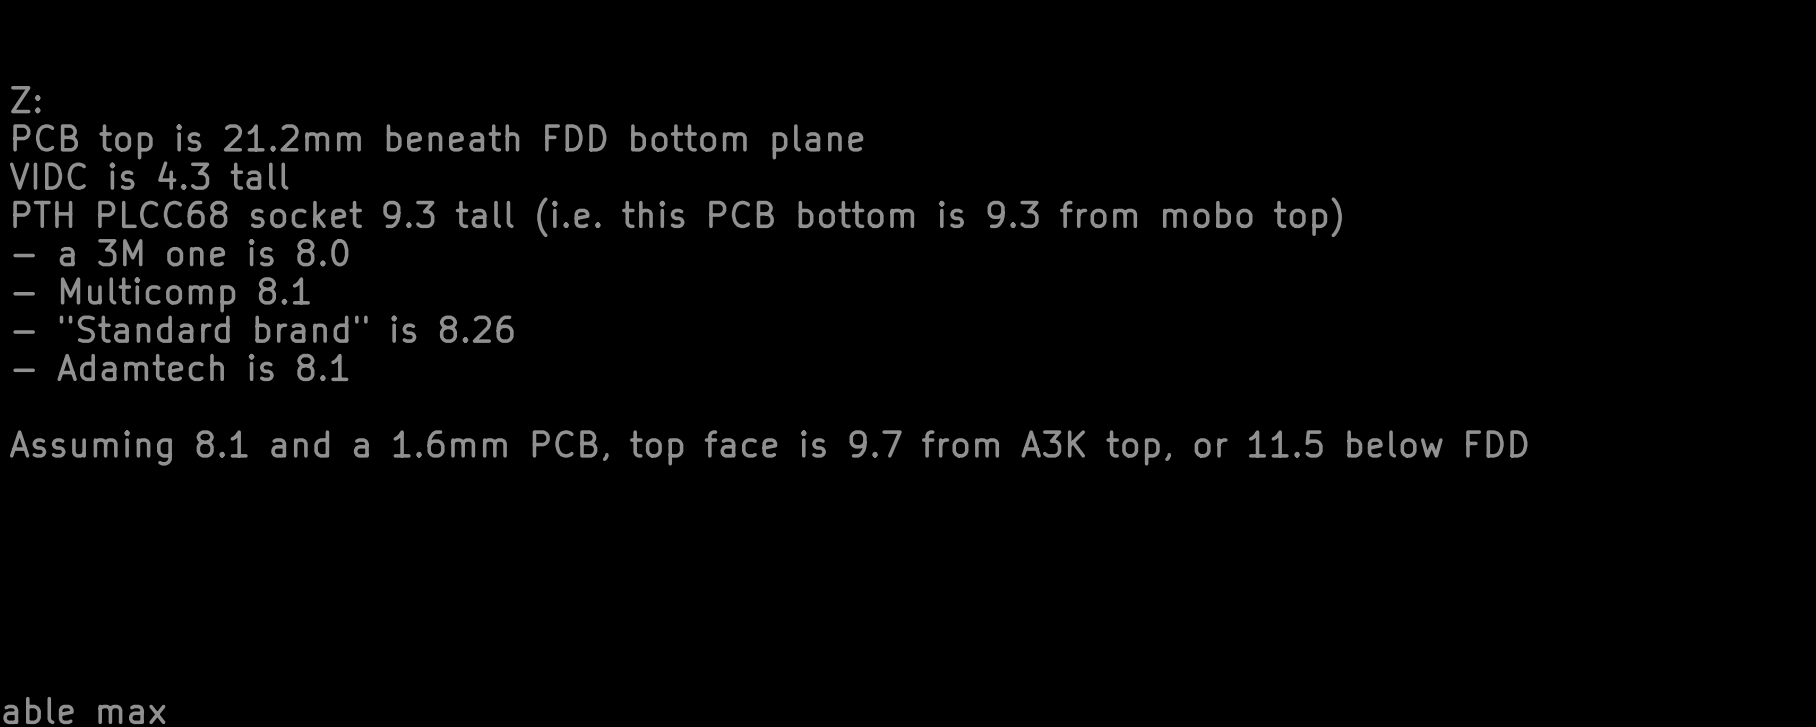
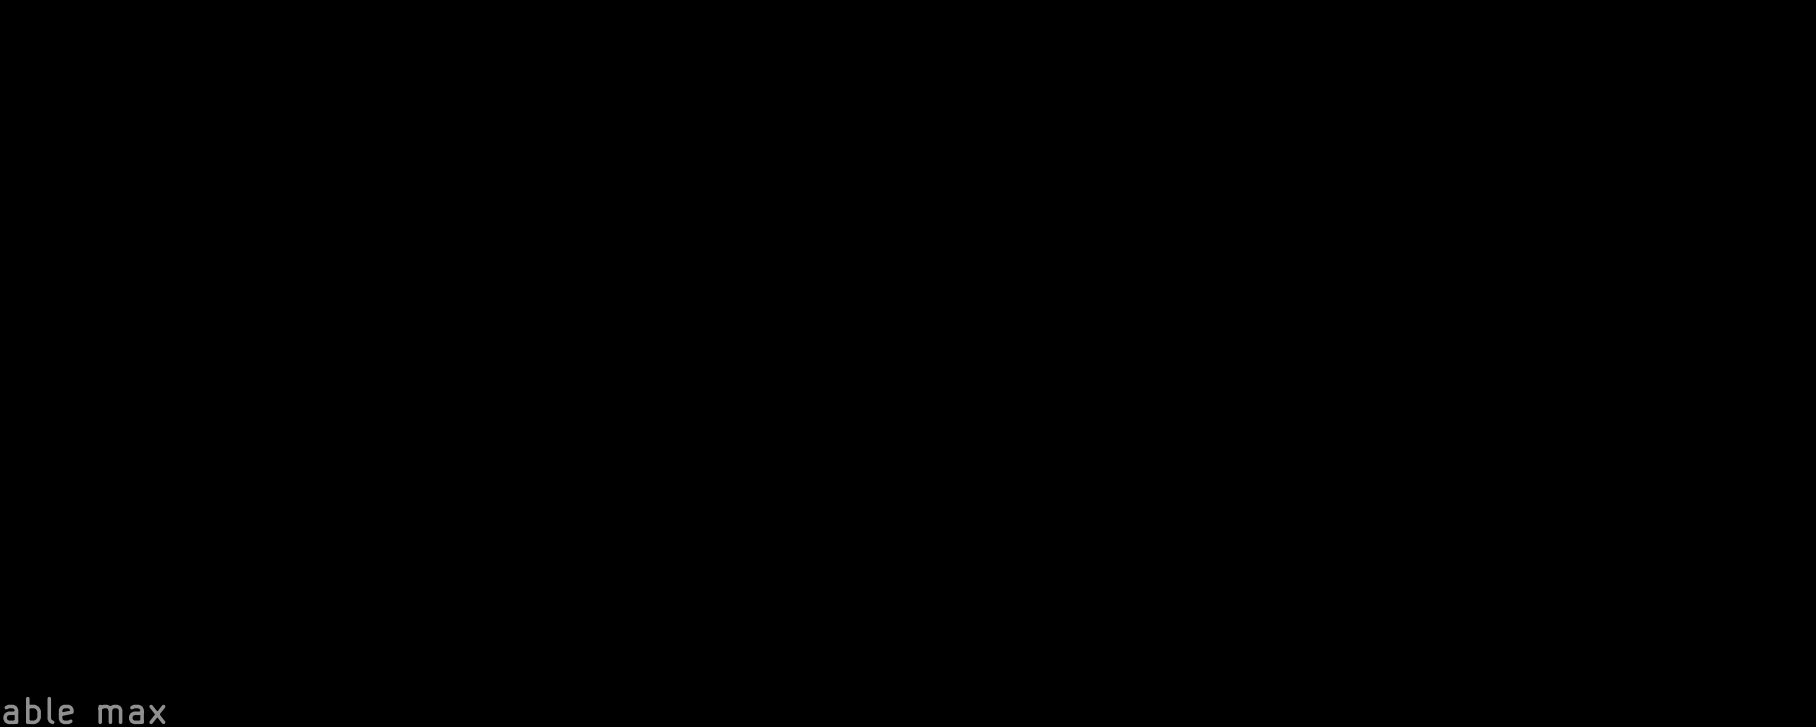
text: Z: (25, 99) -> none
text: PCB top is 21.2mm beneath FDD bottom plane (438, 141) -> none
text: VIDC is 4.3 tall (149, 175) -> none
text: PTH PLCC68 socket 9.3 tall (i.e. this PCB bottom is 9.3 from mobo top) (677, 217) -> none
text: - a 3M one is 8.0 (180, 252) -> none
text: - Multicomp 8.1 (161, 294) -> none
text: - "Standard brand" is 8.26 (263, 329) -> none
text: - Adamtech is 8.1 (180, 367) -> none
text: Assuming 8.1 and a 1.6mm PCB, top face is 9.7 from A3K top, or 11.5 below FDD (768, 447) -> none

